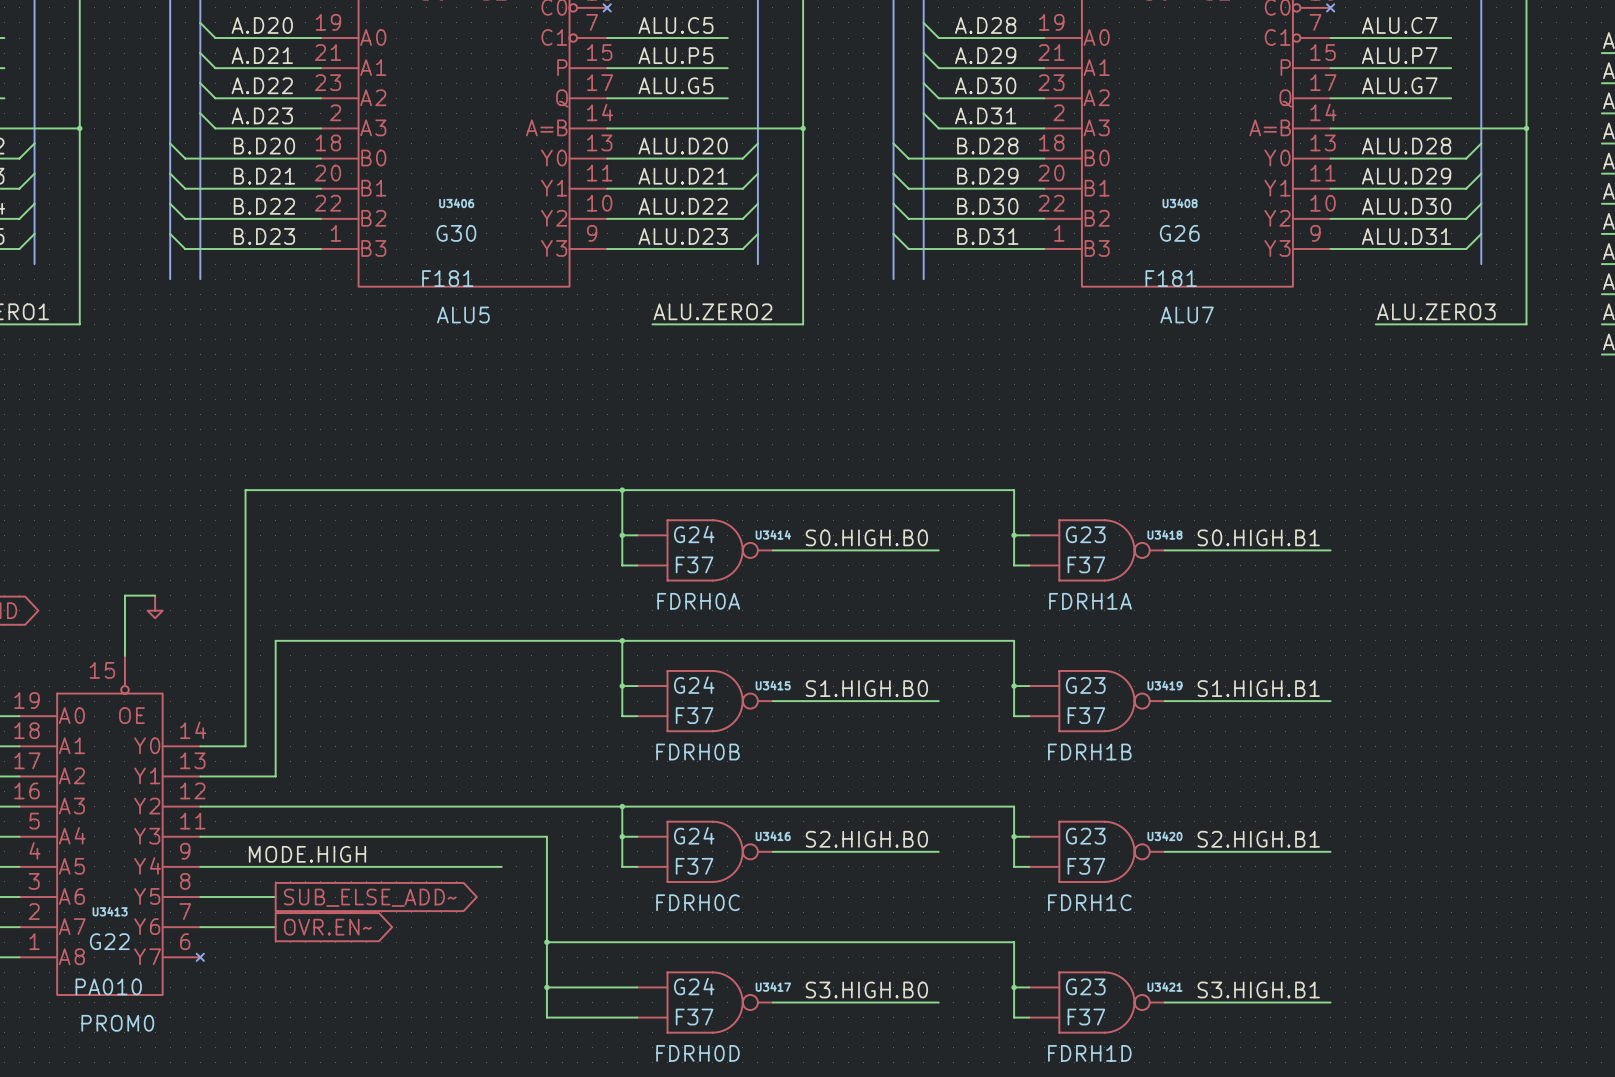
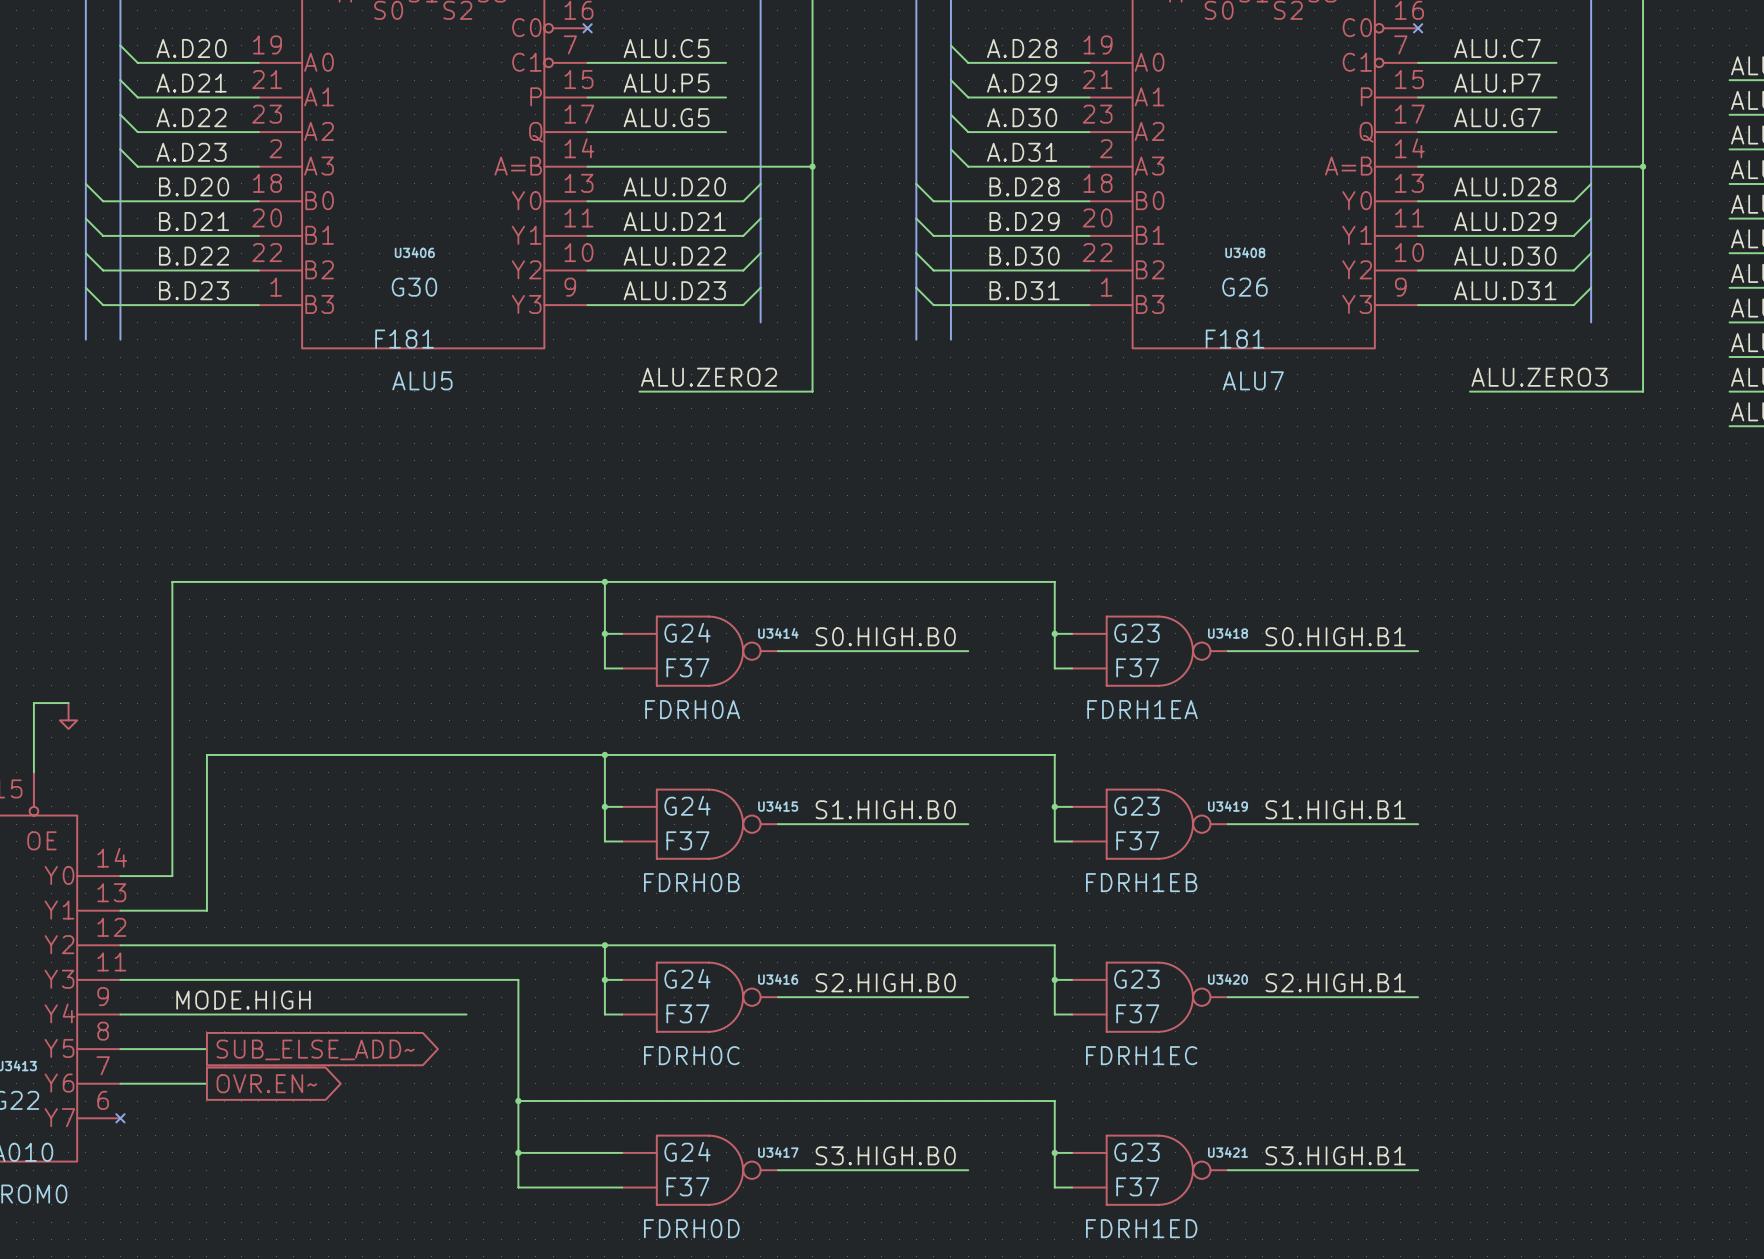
U3418 text: FDRH1A (1090, 601) -> FDRH1EA (1142, 709)
U3419 text: FDRH1B (1089, 752) -> FDRH1EB (1141, 882)
U3420 text: FDRH1C (1089, 902) -> FDRH1EC (1141, 1055)
U3421 text: FDRH1D (1089, 1053) -> FDRH1ED (1141, 1228)

